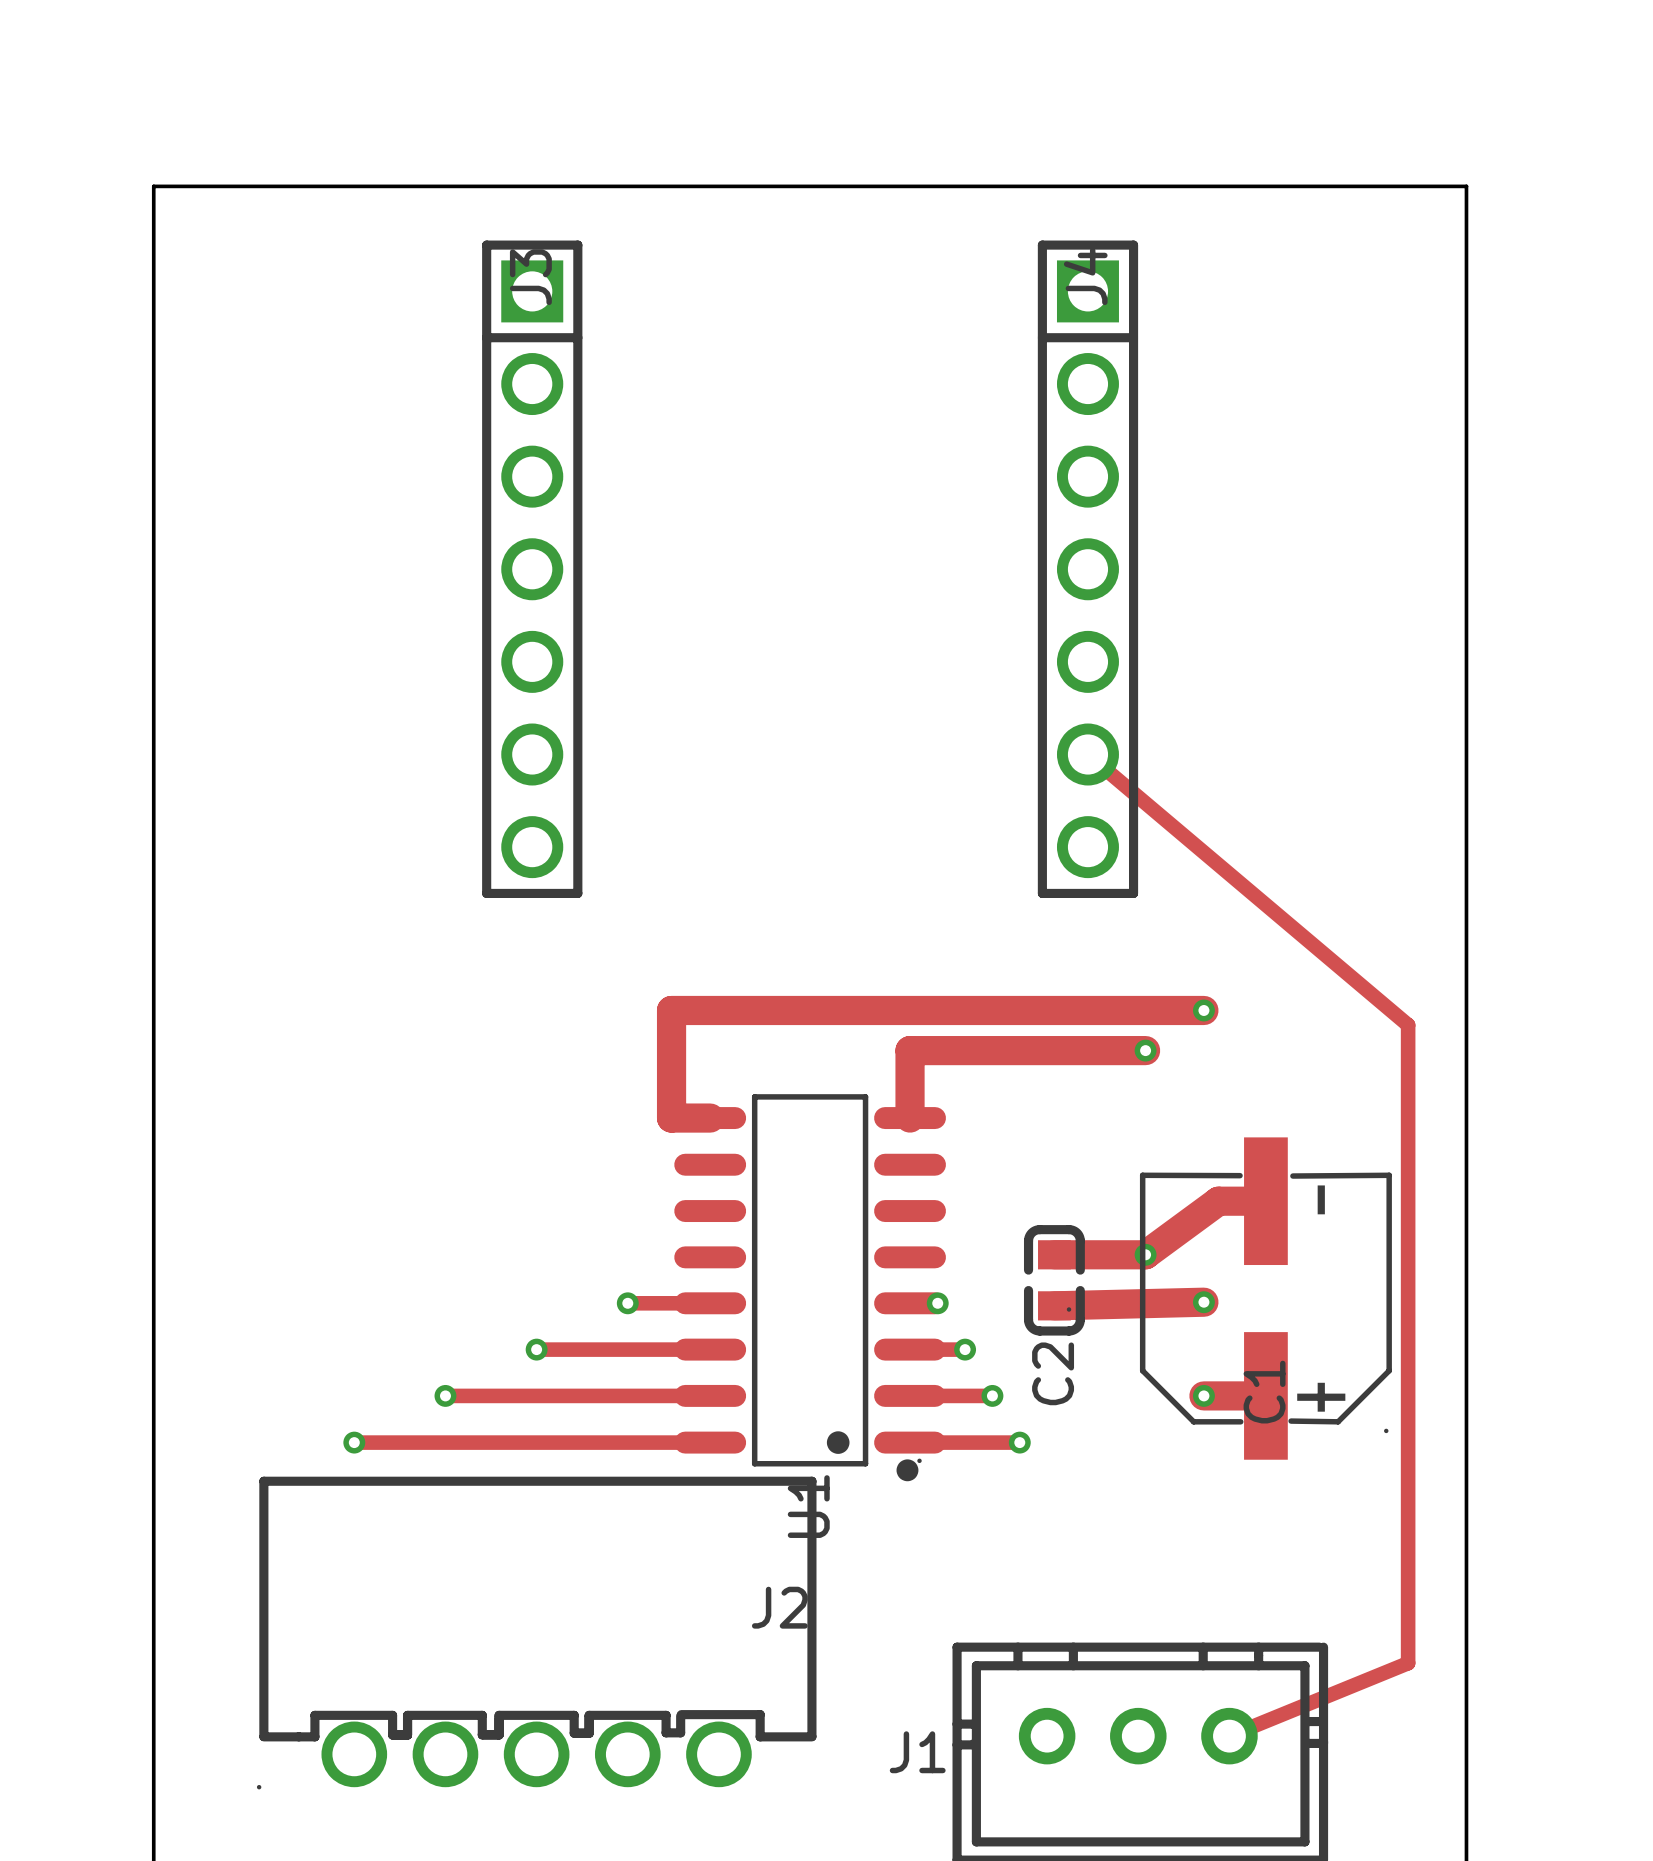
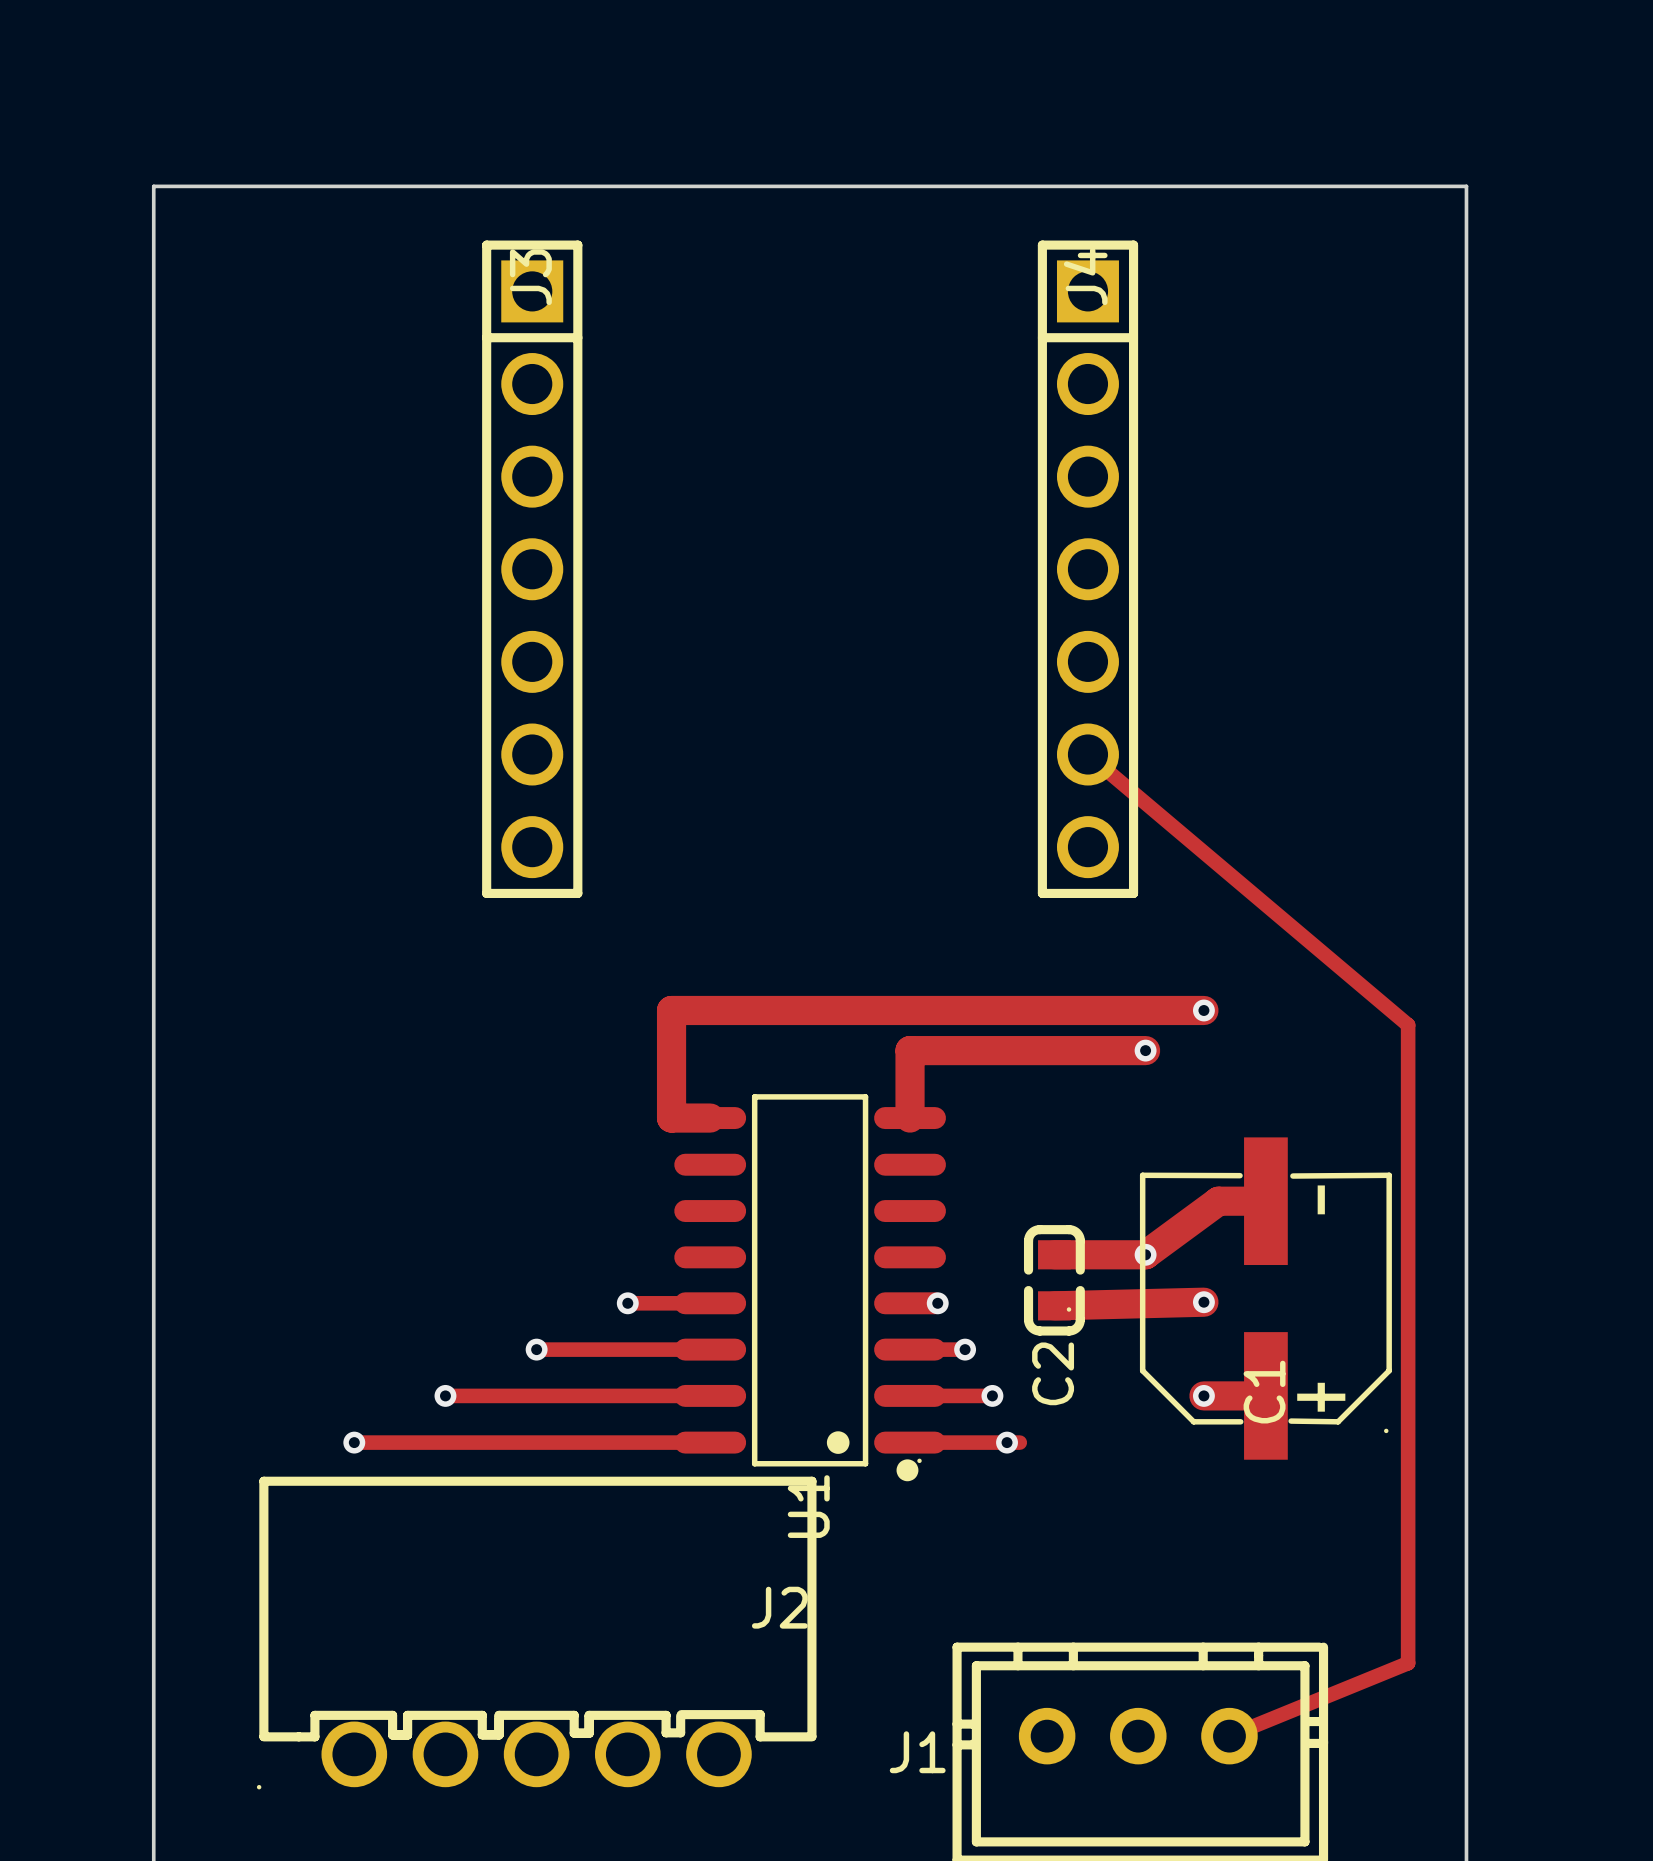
via position: (1019, 1442) -> (1007, 1442)

